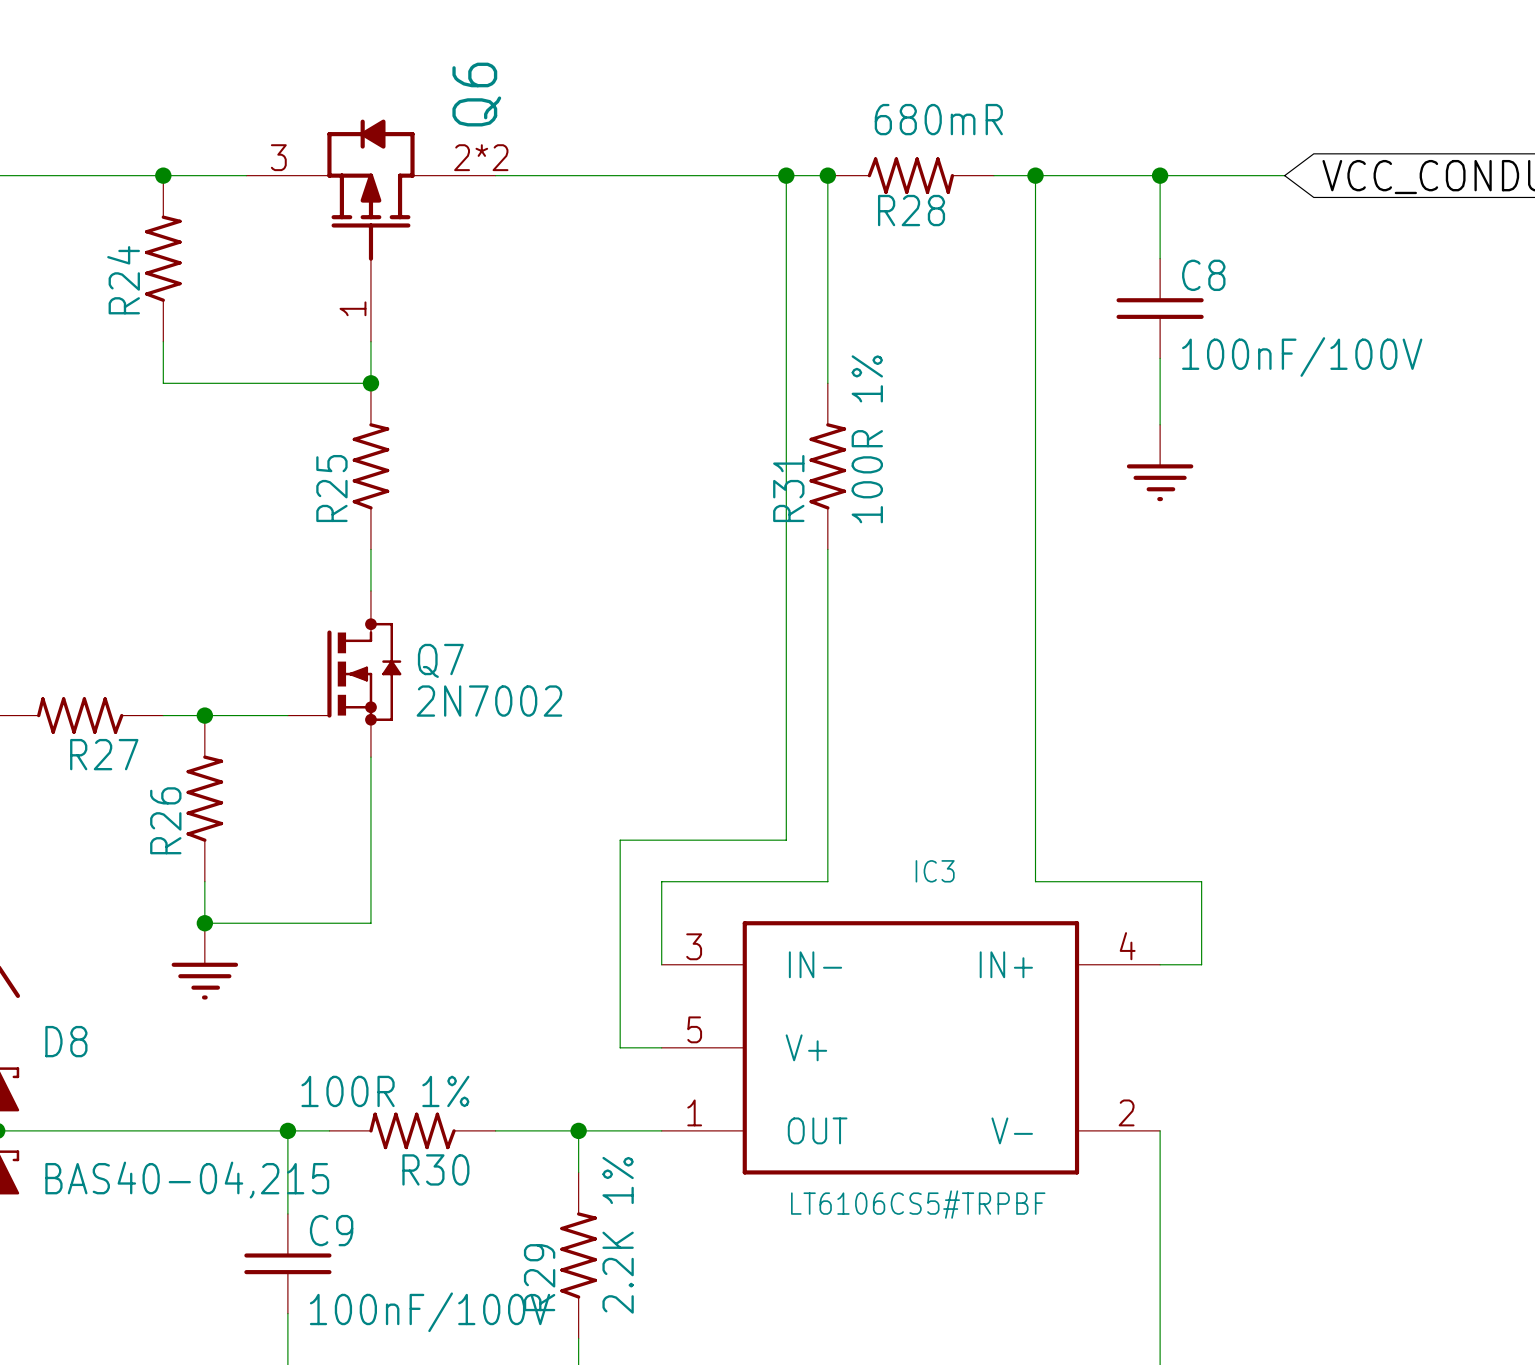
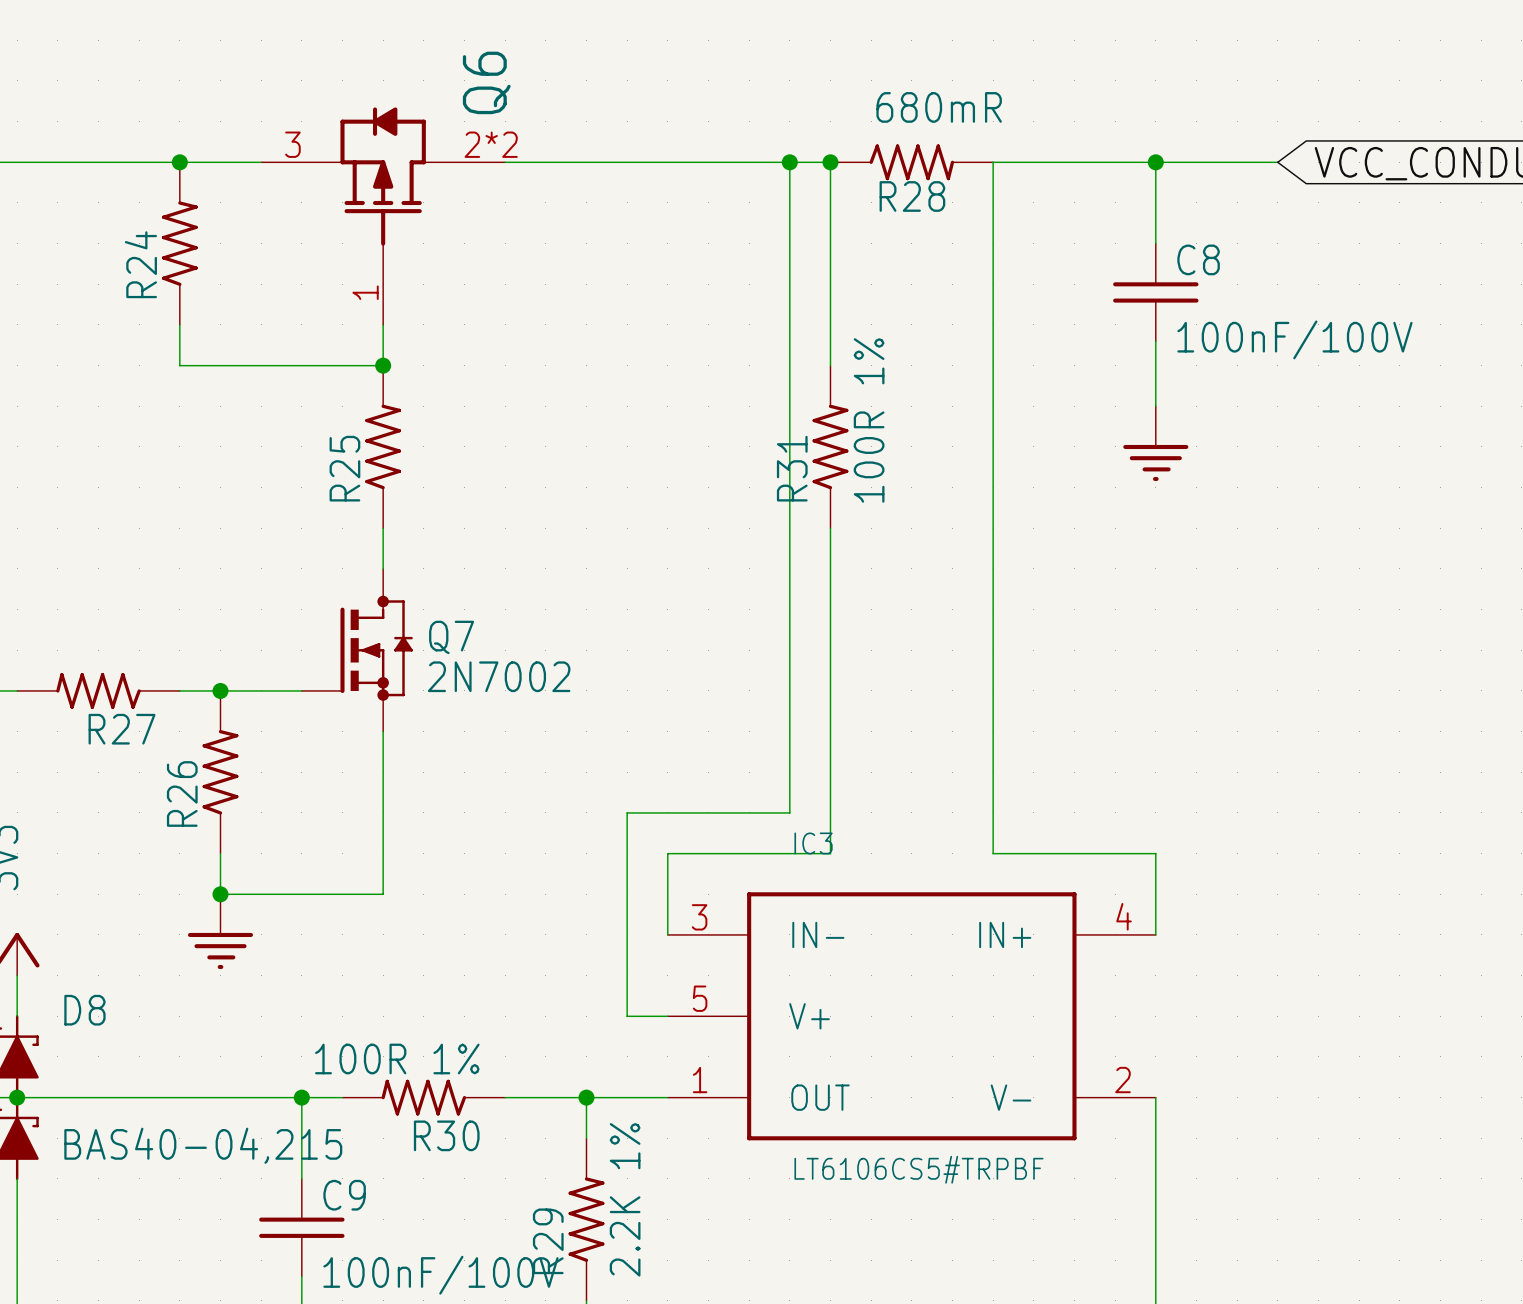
wire: (1035, 175) (1035, 881) -> (993, 162) (993, 853) (1033, 853)
junction: (1035, 175) -> none
IC3 name position: IC3 (935, 871) -> IC3 (813, 843)
wire: (1160, 881) (1201, 881) (1201, 964) (1160, 964) -> (1155, 853) (1155, 934)

